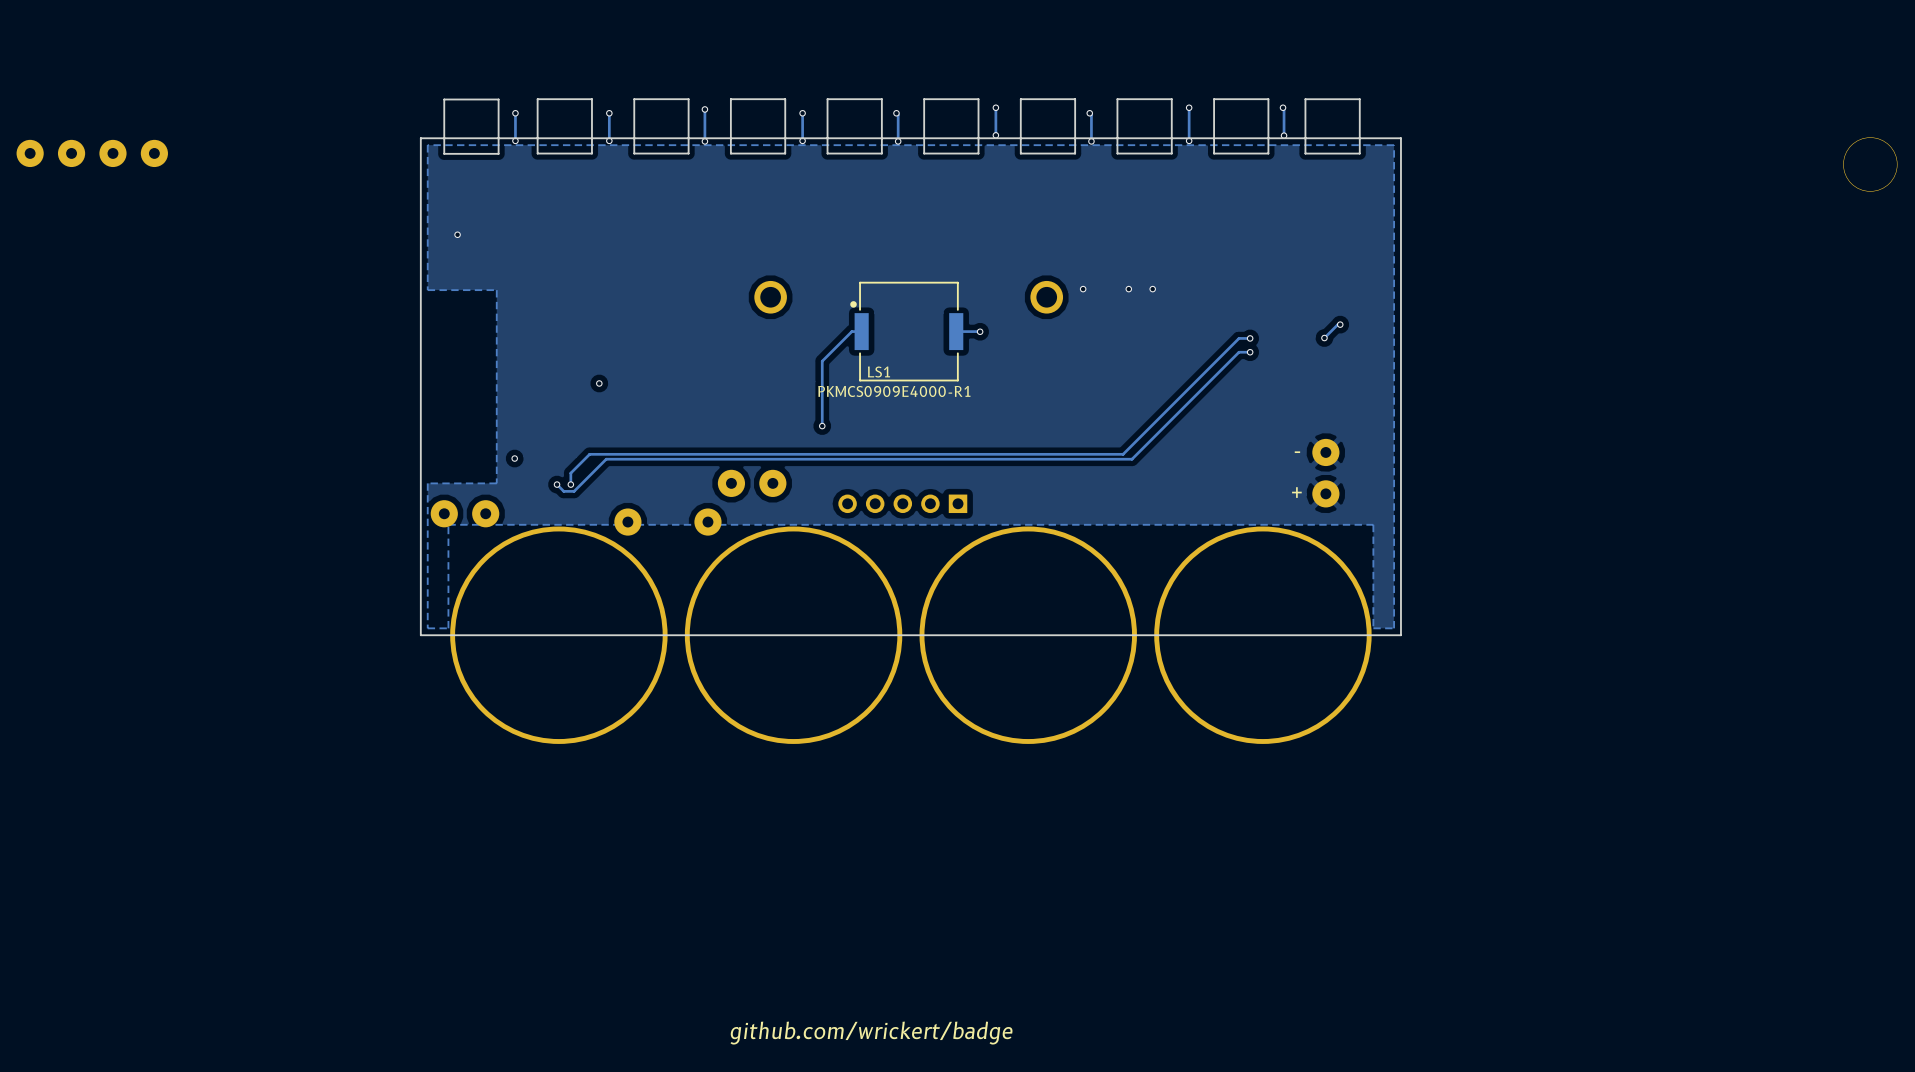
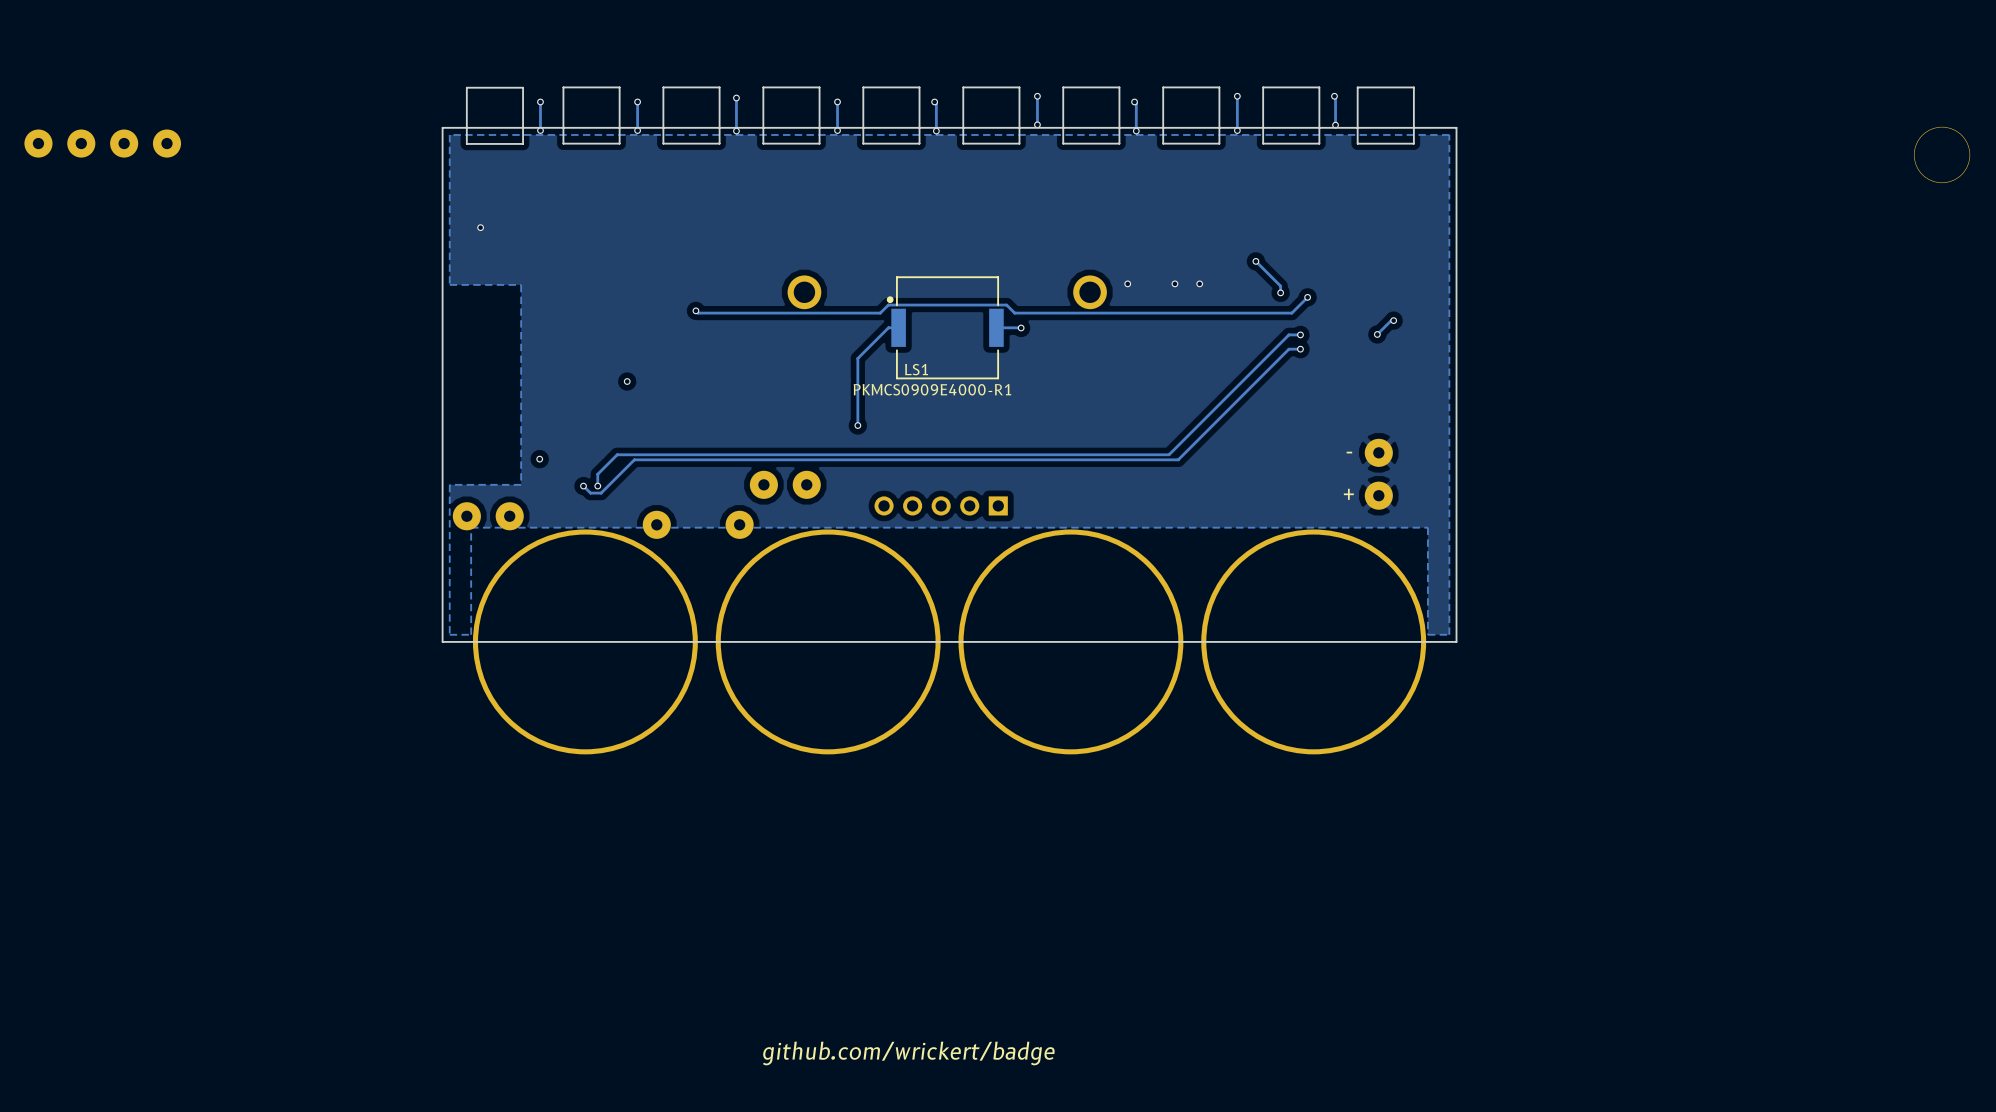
track: none -> (1255, 261) (1280, 286) (1280, 292)
via: none -> (1255, 261)
via: none -> (1280, 292)
track: none -> (1307, 297) (1291, 313) (1014, 313) (1006, 305) (888, 305) (880, 313) (698, 313) (695, 310)
via: none -> (1307, 297)
via: none -> (695, 310)

